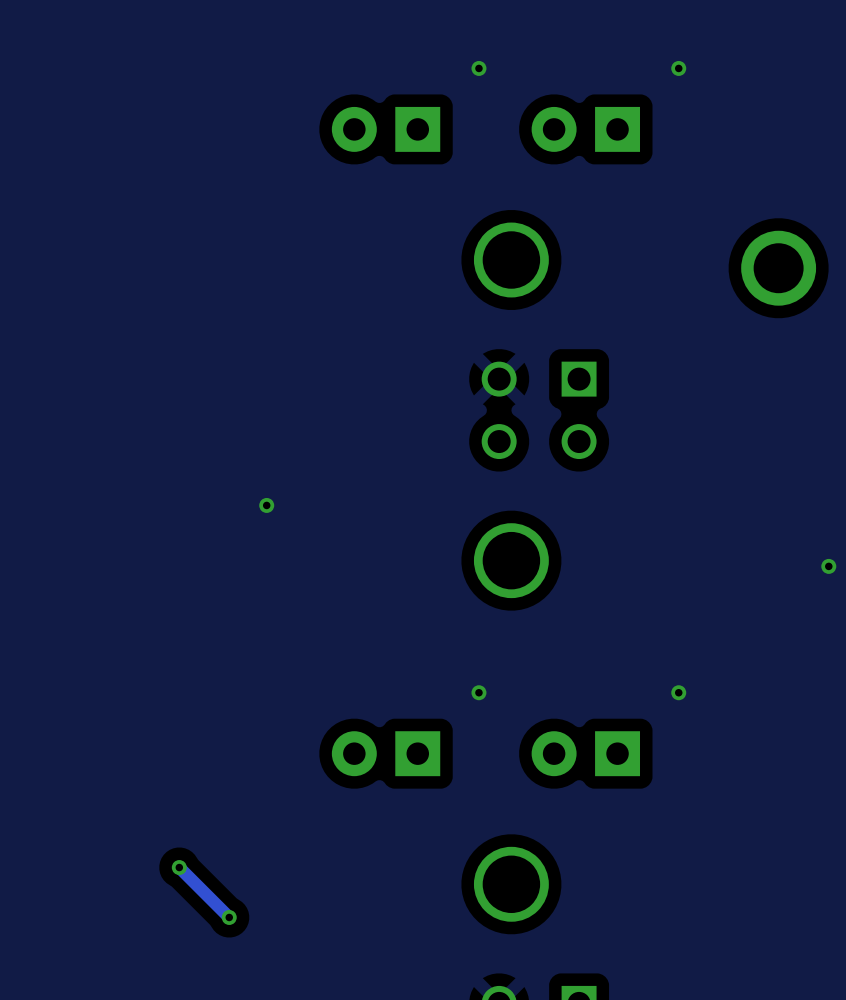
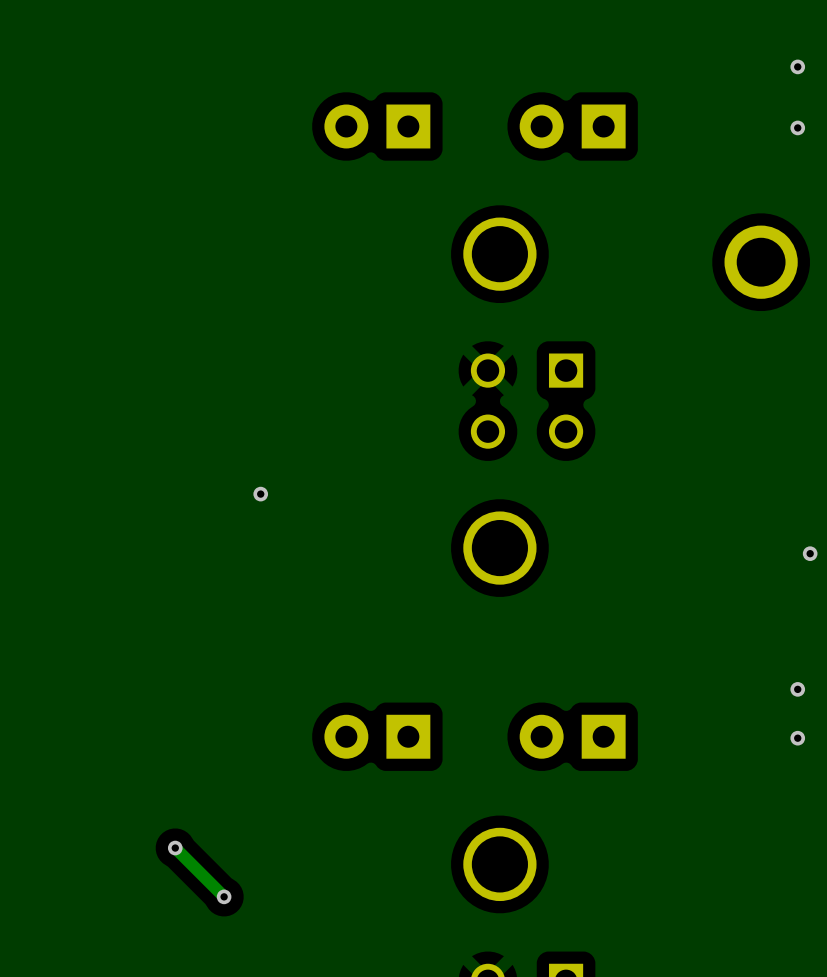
via: (478, 68) -> none
via: (678, 68) -> none
via: none -> (797, 66)
via: none -> (797, 127)
via: (478, 692) -> none
via: (678, 692) -> none
via: none -> (797, 689)
via: none -> (797, 738)

